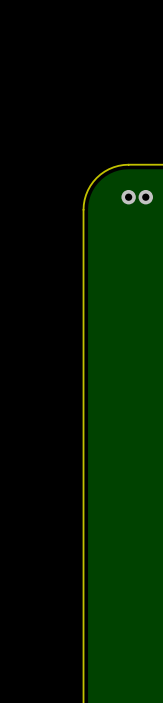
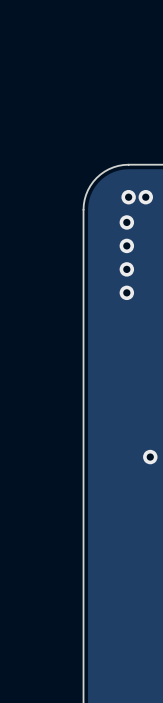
via: none -> (126, 222)
via: none -> (126, 245)
via: none -> (126, 269)
via: none -> (126, 292)
via: none -> (150, 457)

